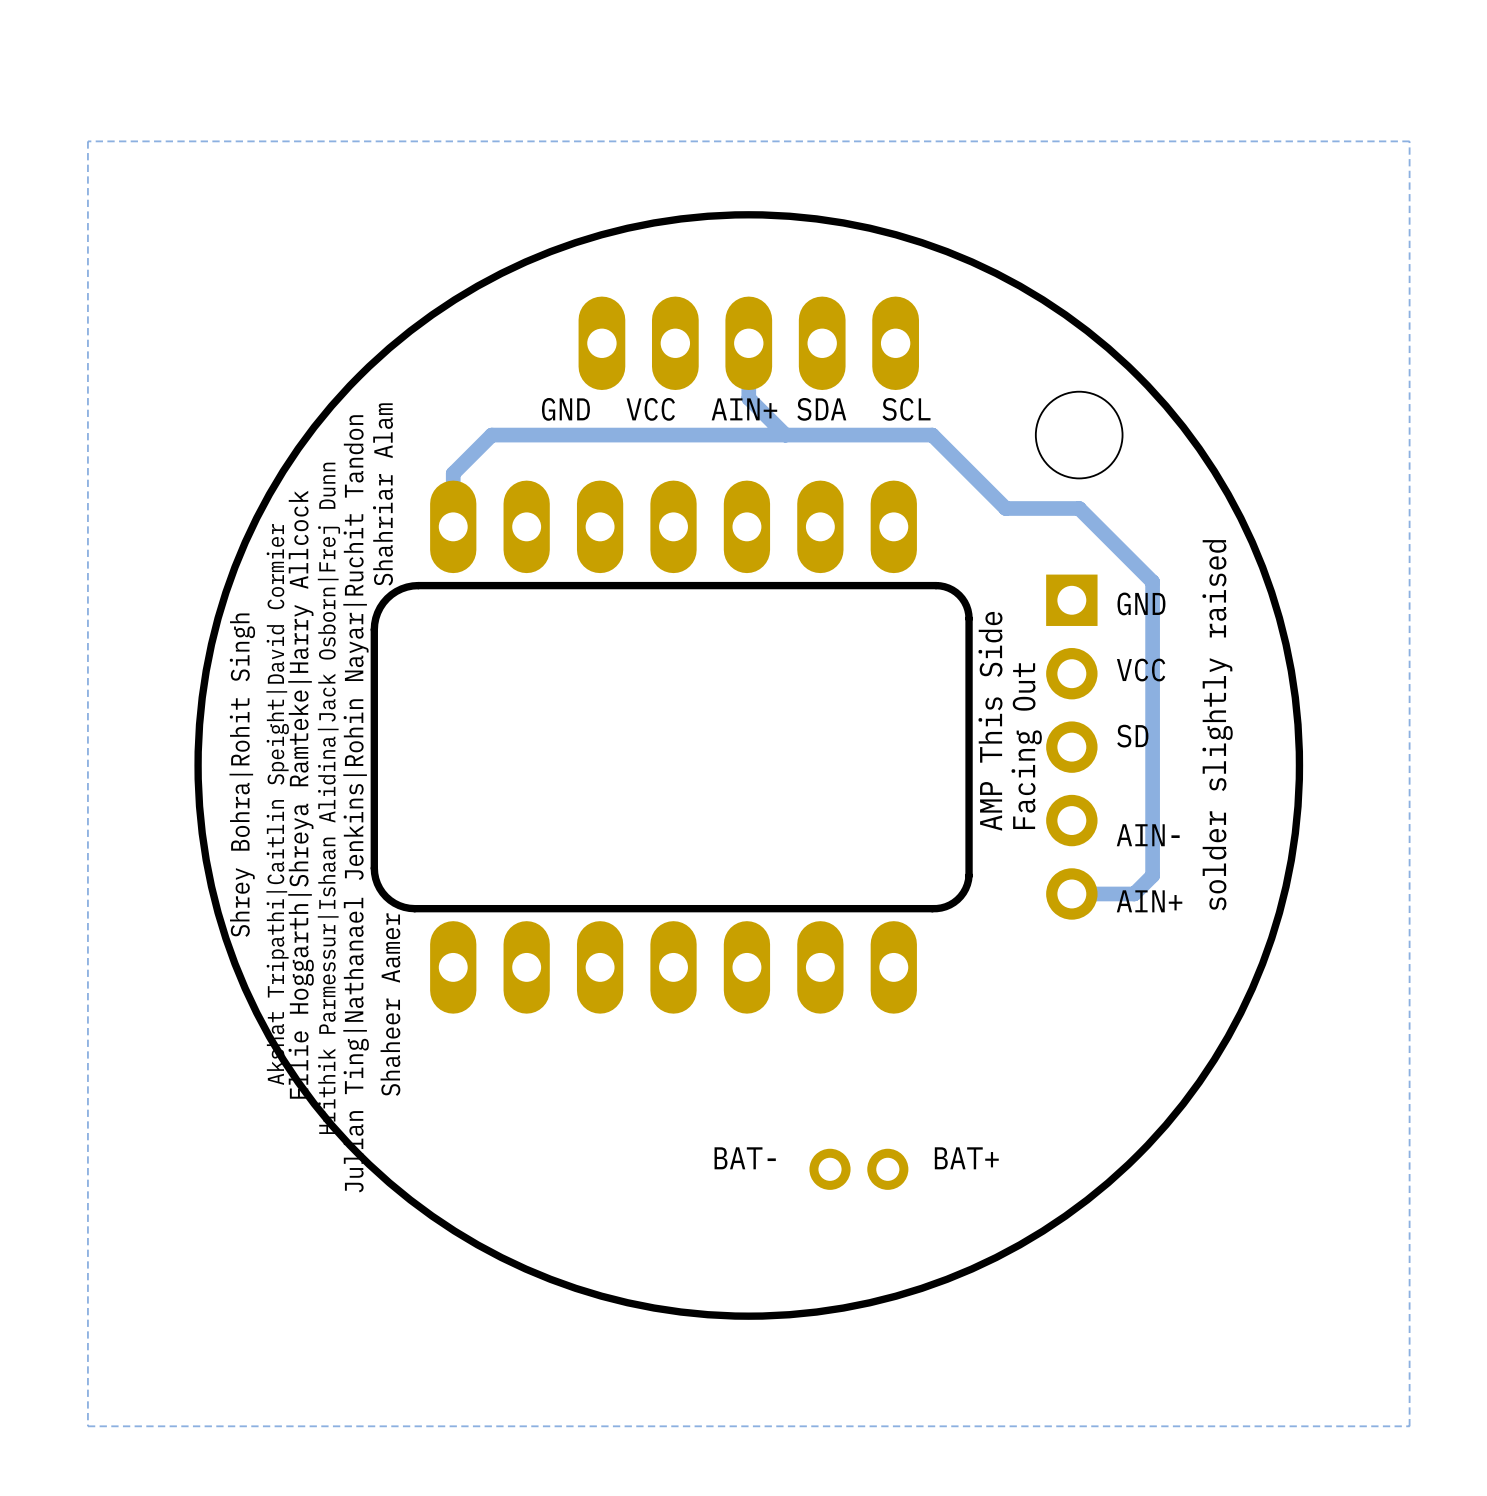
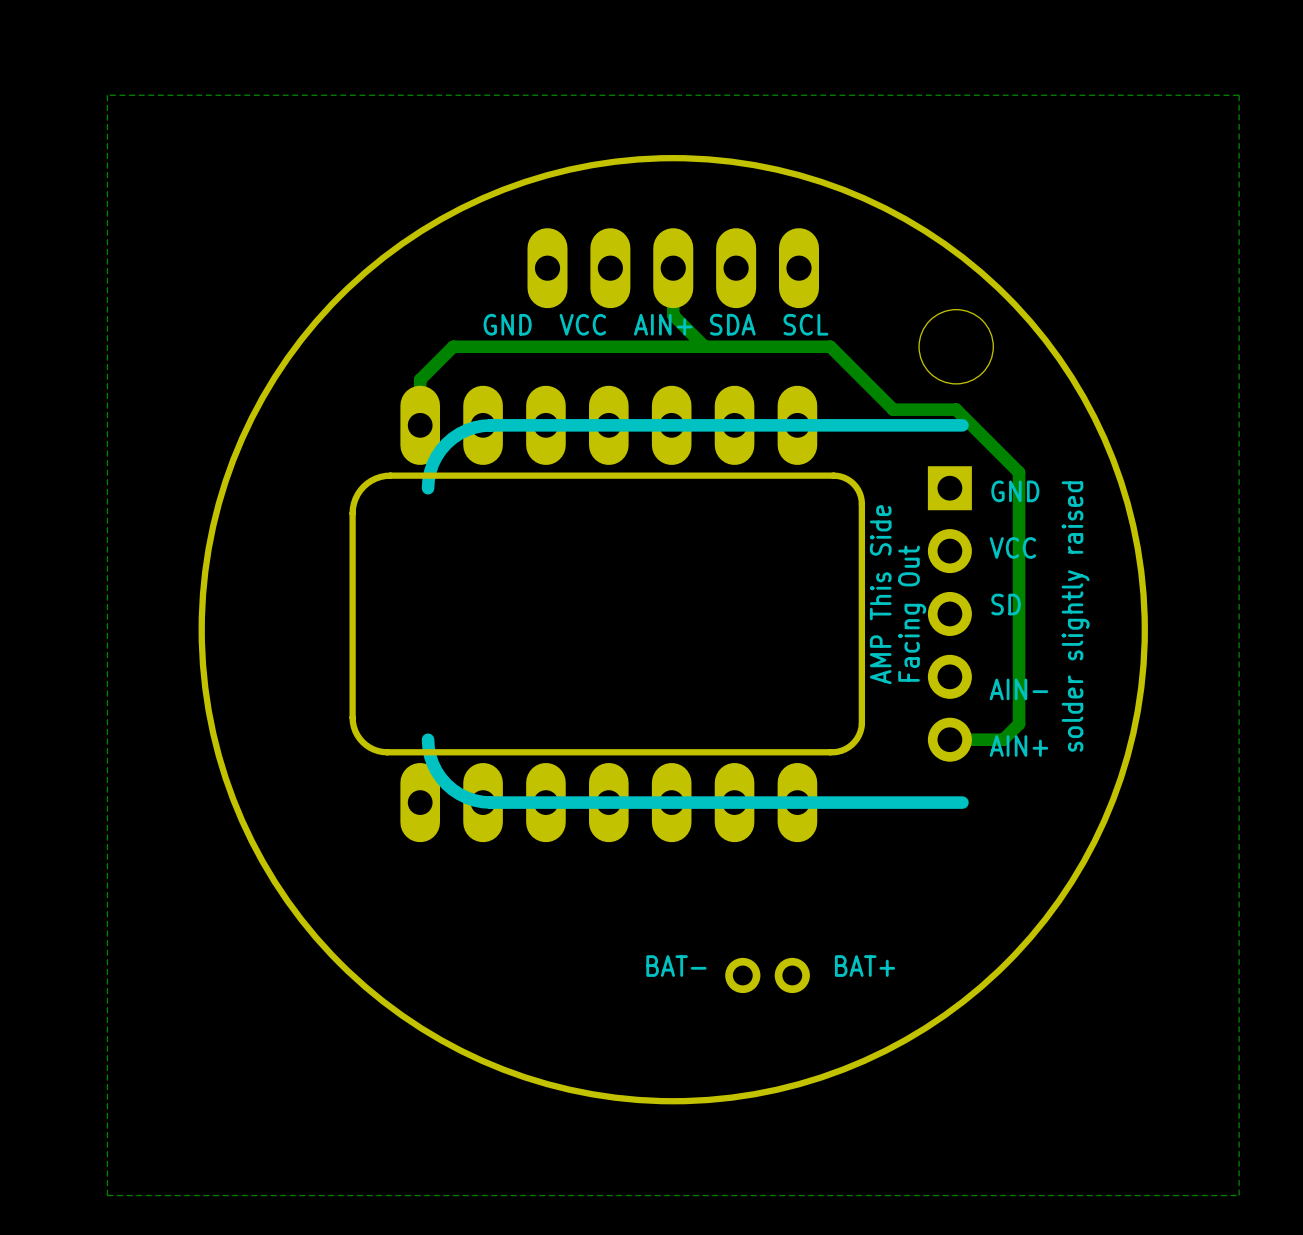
text: Shahriar Alam (382, 494) -> none
line: none -> (962, 425) (482, 425) (466, 430) (446, 443) (432, 464) (428, 488)
text: Shrey Bohra|Rohit Singh (242, 775) -> none
text: Ellie Hoggarth|Shreya Ramteke|Harry Allcock (301, 794) -> none
text: Hrithik Parmessur|Ishaan Alidina|Jack Osborn|Frej Dunn (328, 798) -> none
text: Julian Ting|Nathanael Jenkins|Rohin Nayar|Ruchit Tandon (356, 803) -> none
text: Akshat Tripathi|Caitlin Speight|David Cormier (277, 804) -> none
line: none -> (428, 739) (432, 763) (446, 784) (466, 797) (482, 802) (962, 802)
text: Shaheer Aamer (390, 1004) -> none

